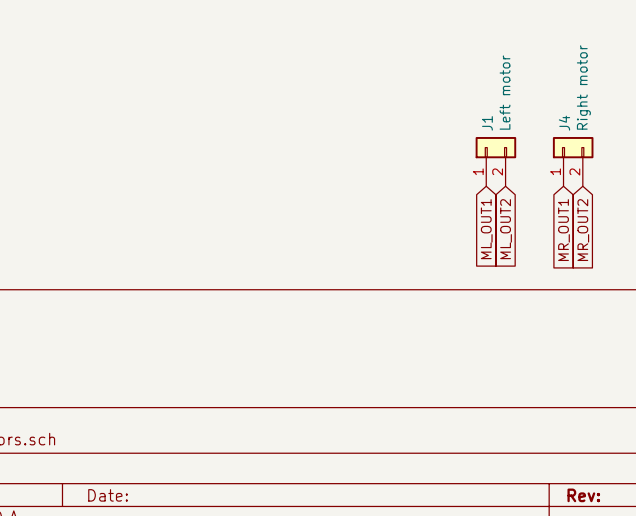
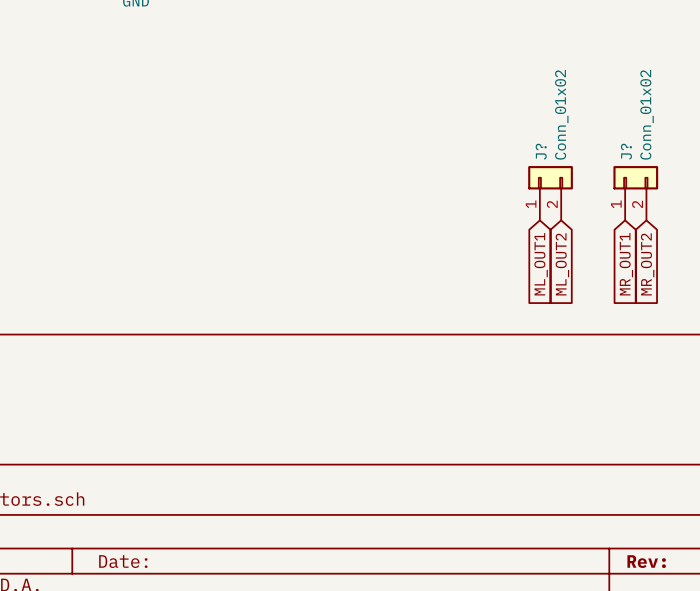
J4 value: Right motor (583, 87) -> Conn_01x02 (647, 114)
J1 value: Left motor (505, 92) -> Conn_01x02 (561, 114)
J1 name: J1 (487, 123) -> J? (541, 151)
J4 name: J4 (564, 123) -> J? (626, 151)

